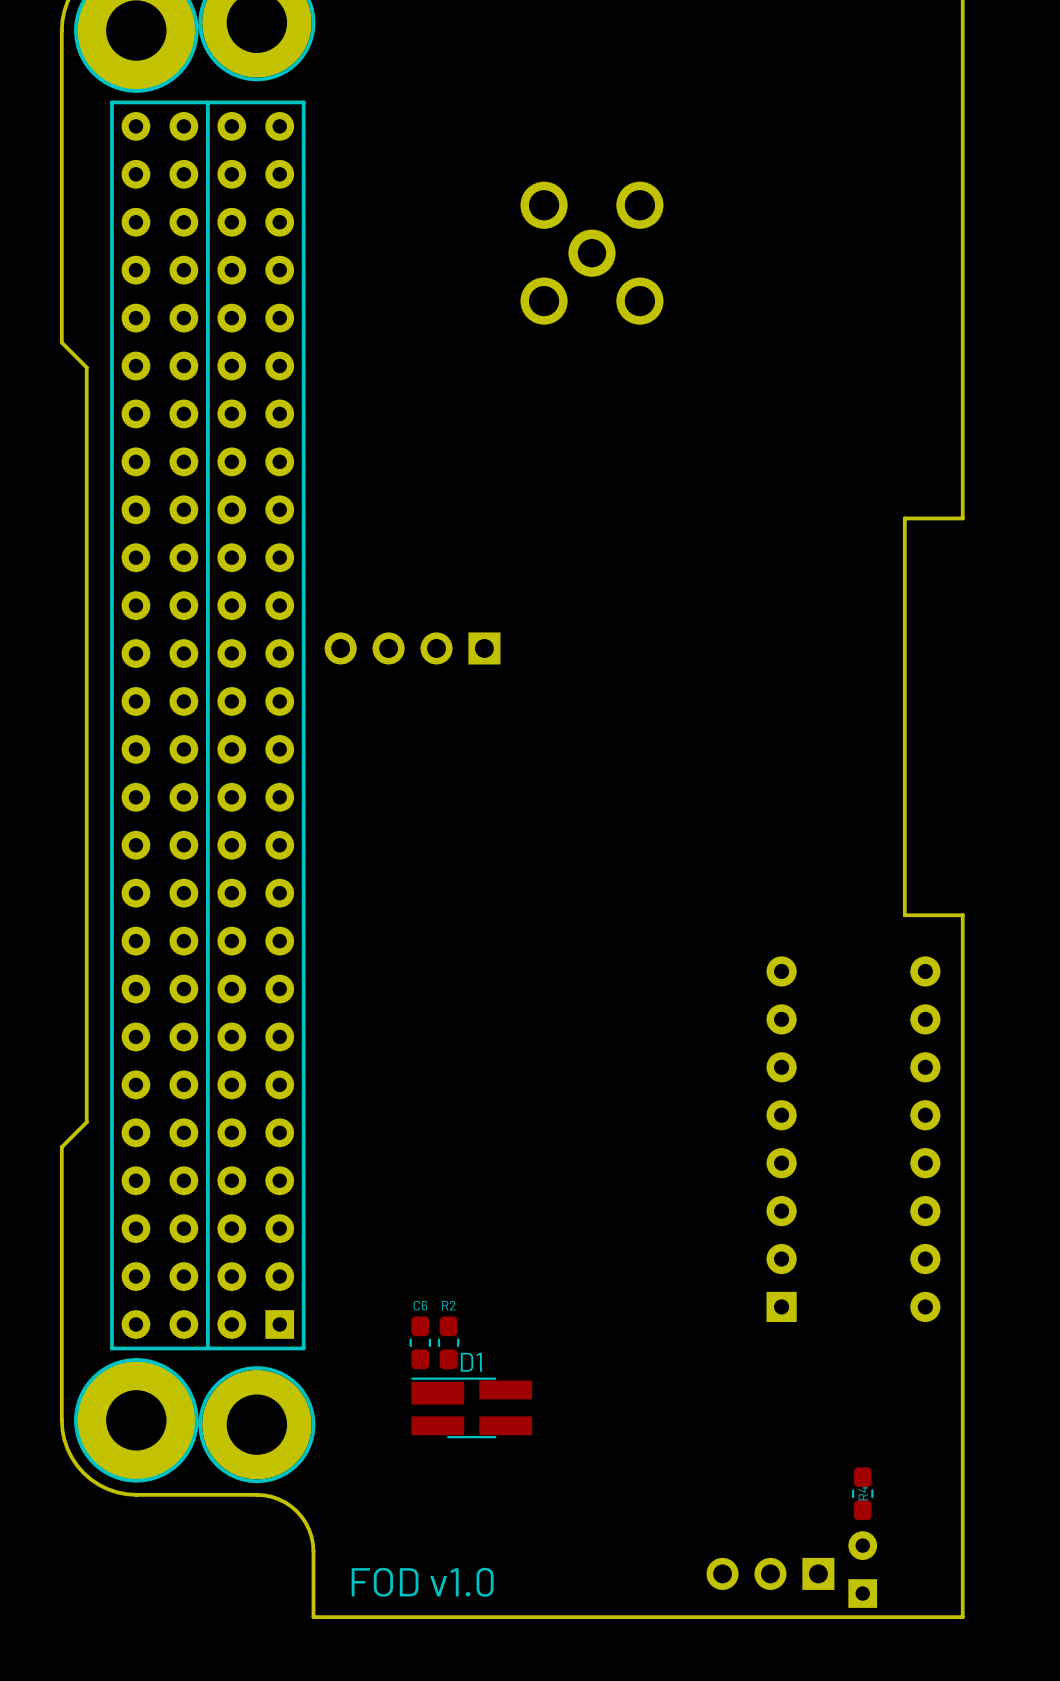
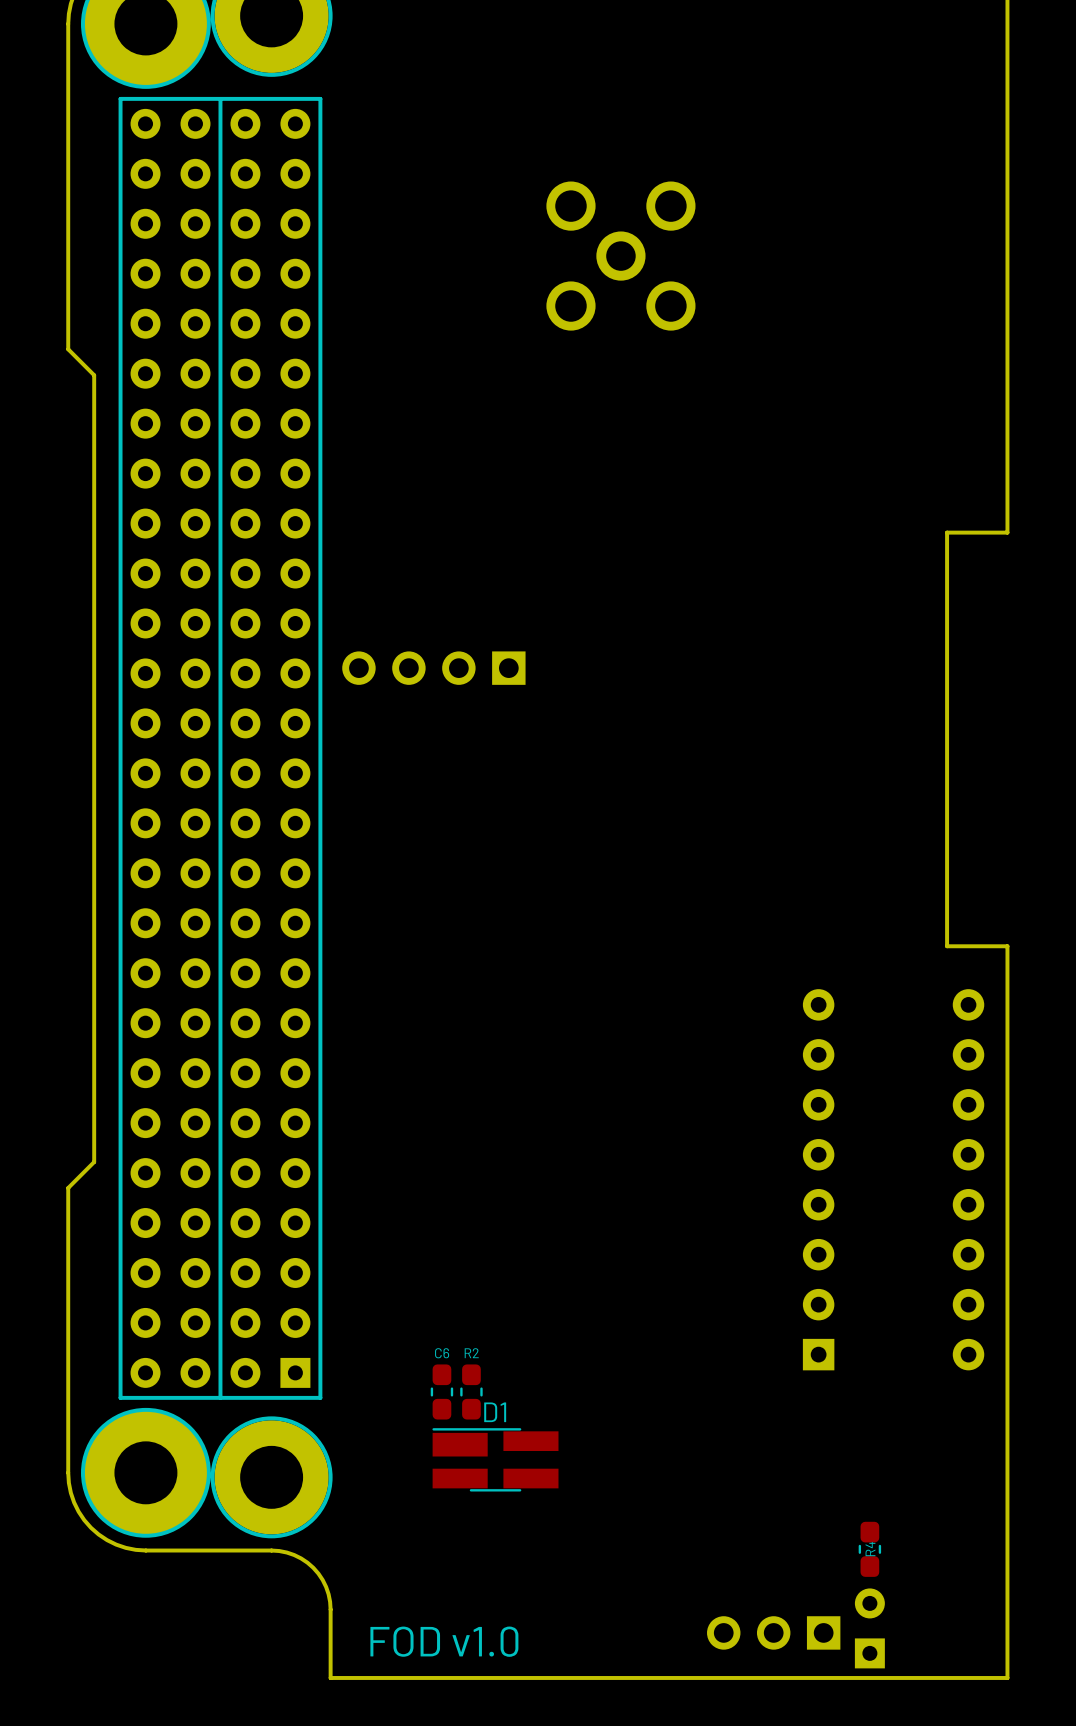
R4 position: (862, 1493) -> (869, 1549)
part position: (862, 1569) -> (869, 1628)
part position: (770, 1573) -> (773, 1632)

